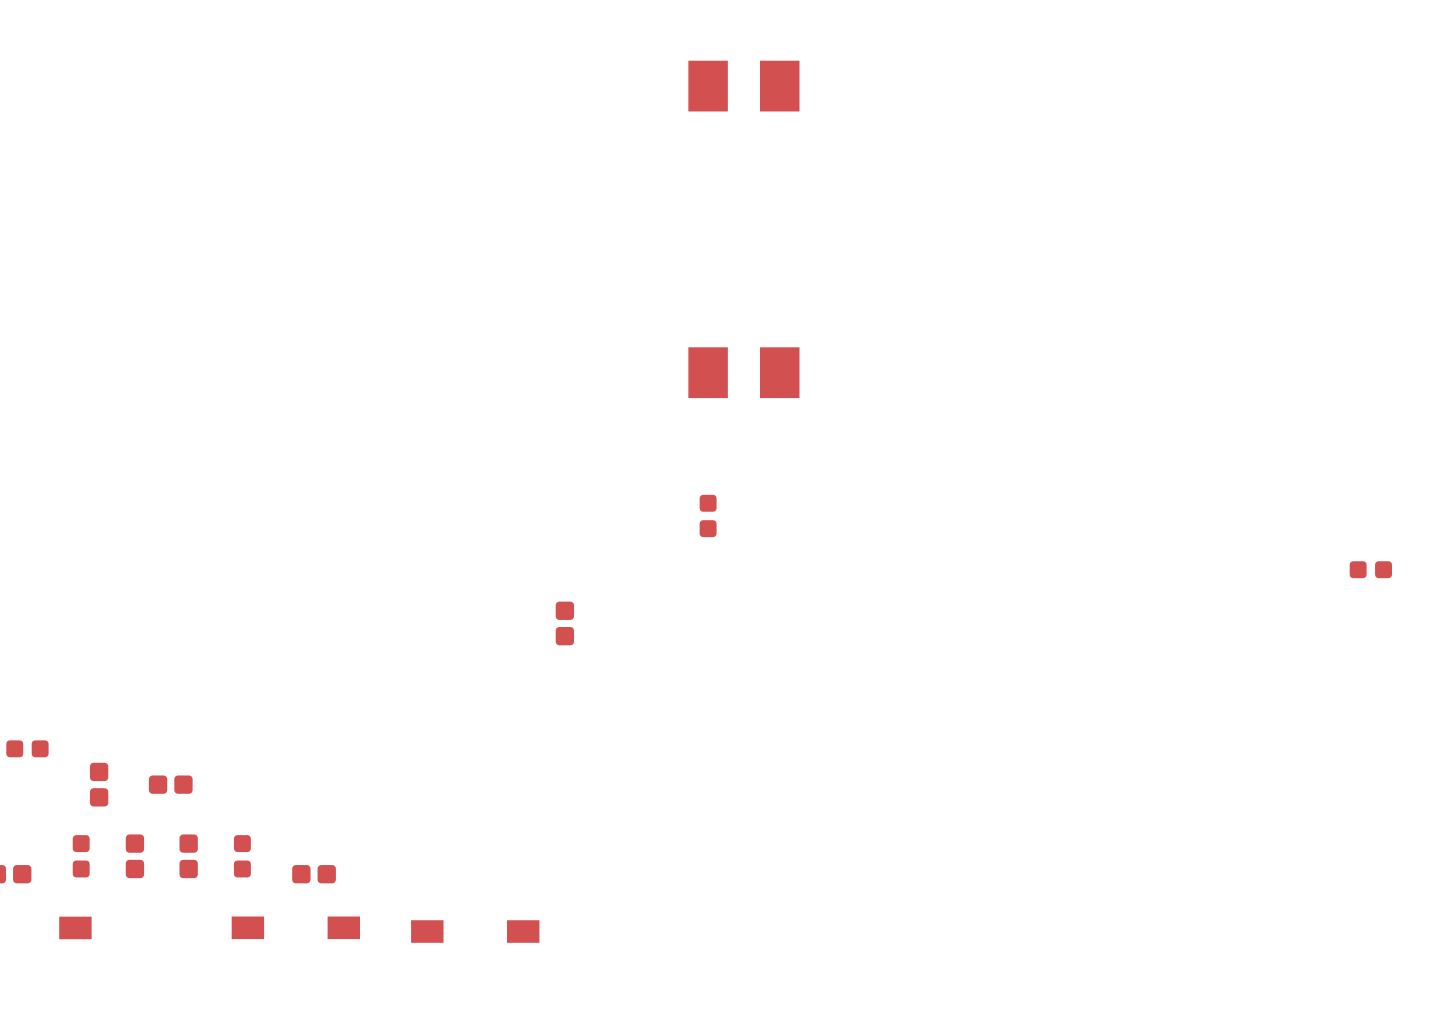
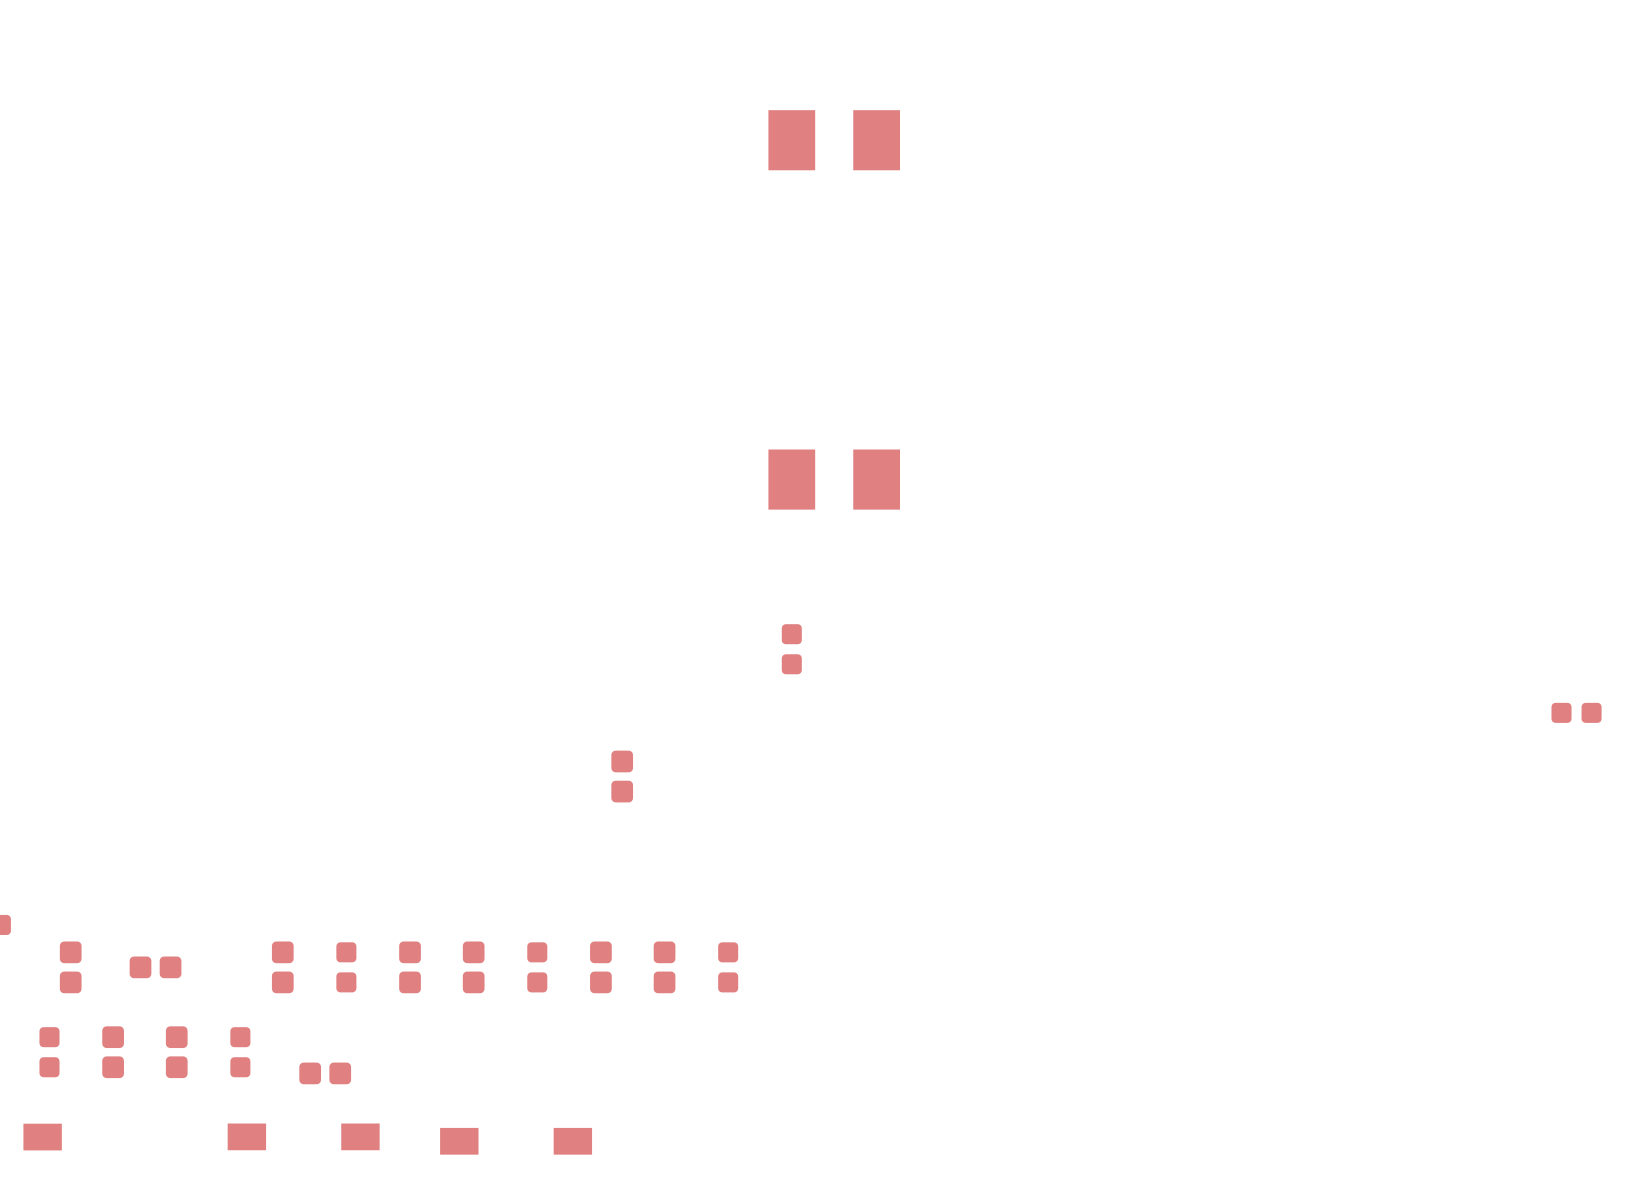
part: none -> (282, 967)
part: none -> (346, 967)
part: none -> (410, 967)
part: none -> (473, 967)
part: none -> (537, 967)
part: none -> (600, 967)
part: none -> (664, 967)
part: none -> (728, 967)

